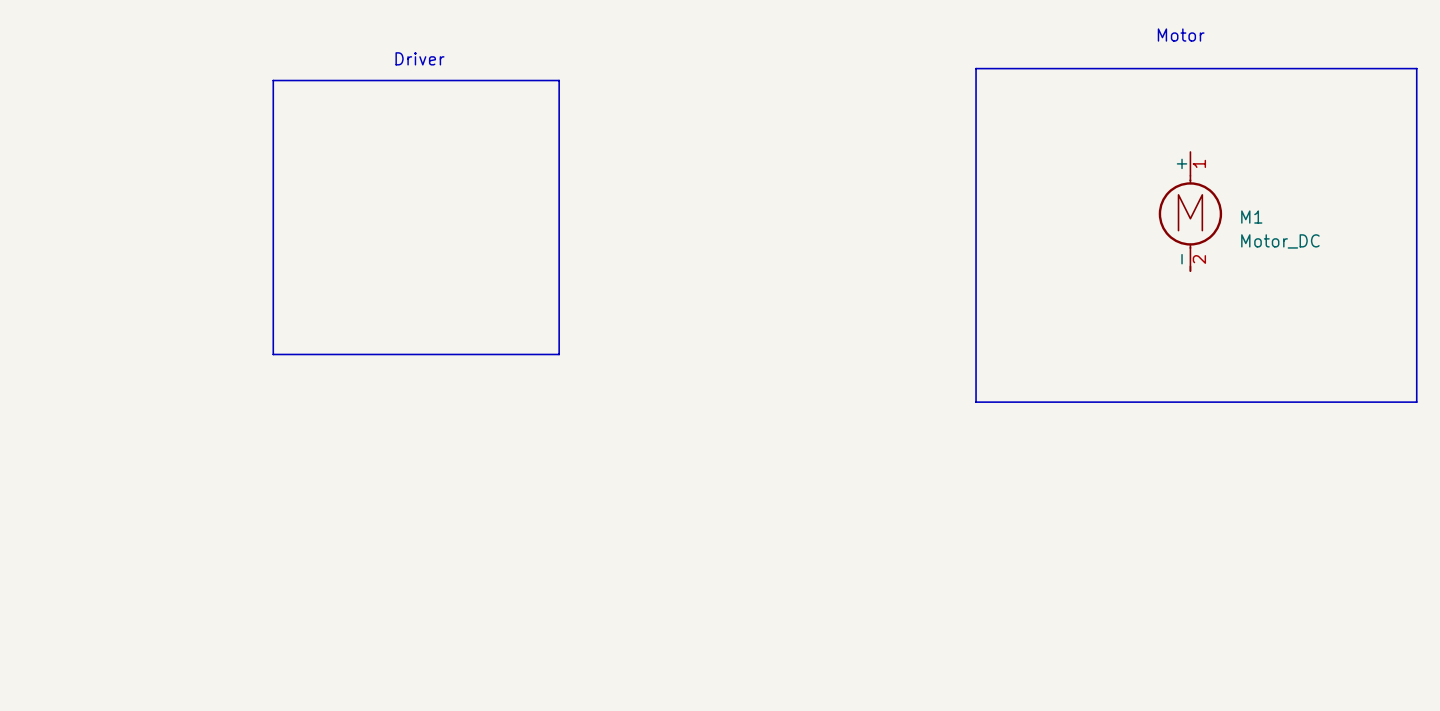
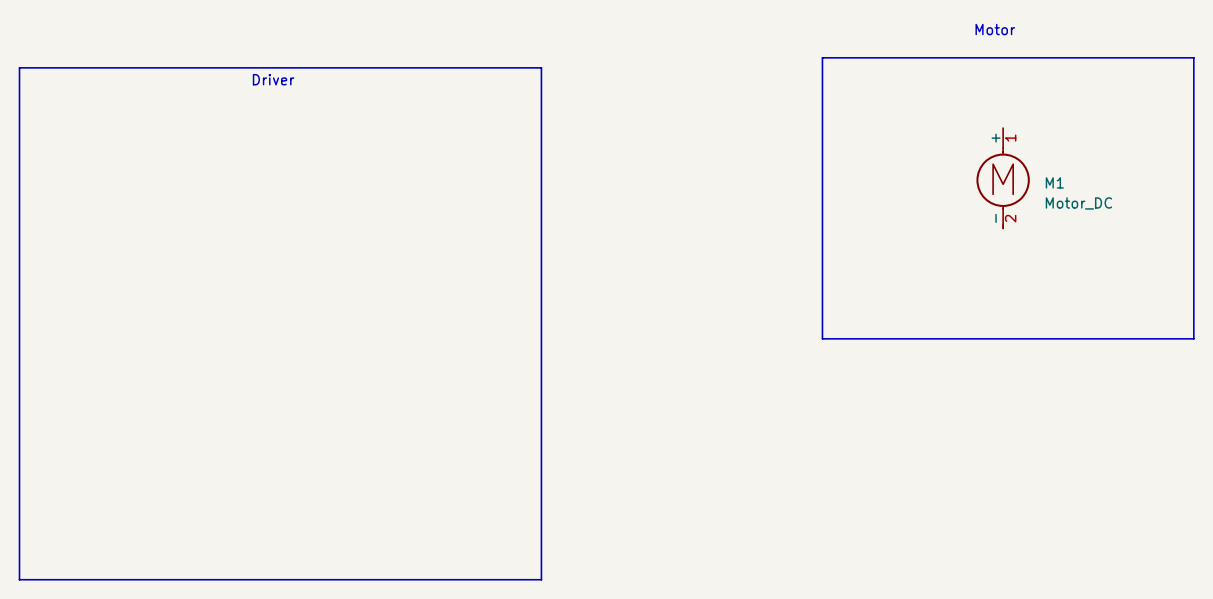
text position: Driver (419, 58) -> Driver (273, 79)
line: (273, 80) (273, 354) (559, 354) (559, 80) -> (230, 67) (19, 67) (19, 579) (541, 579) (541, 67) (471, 67)

